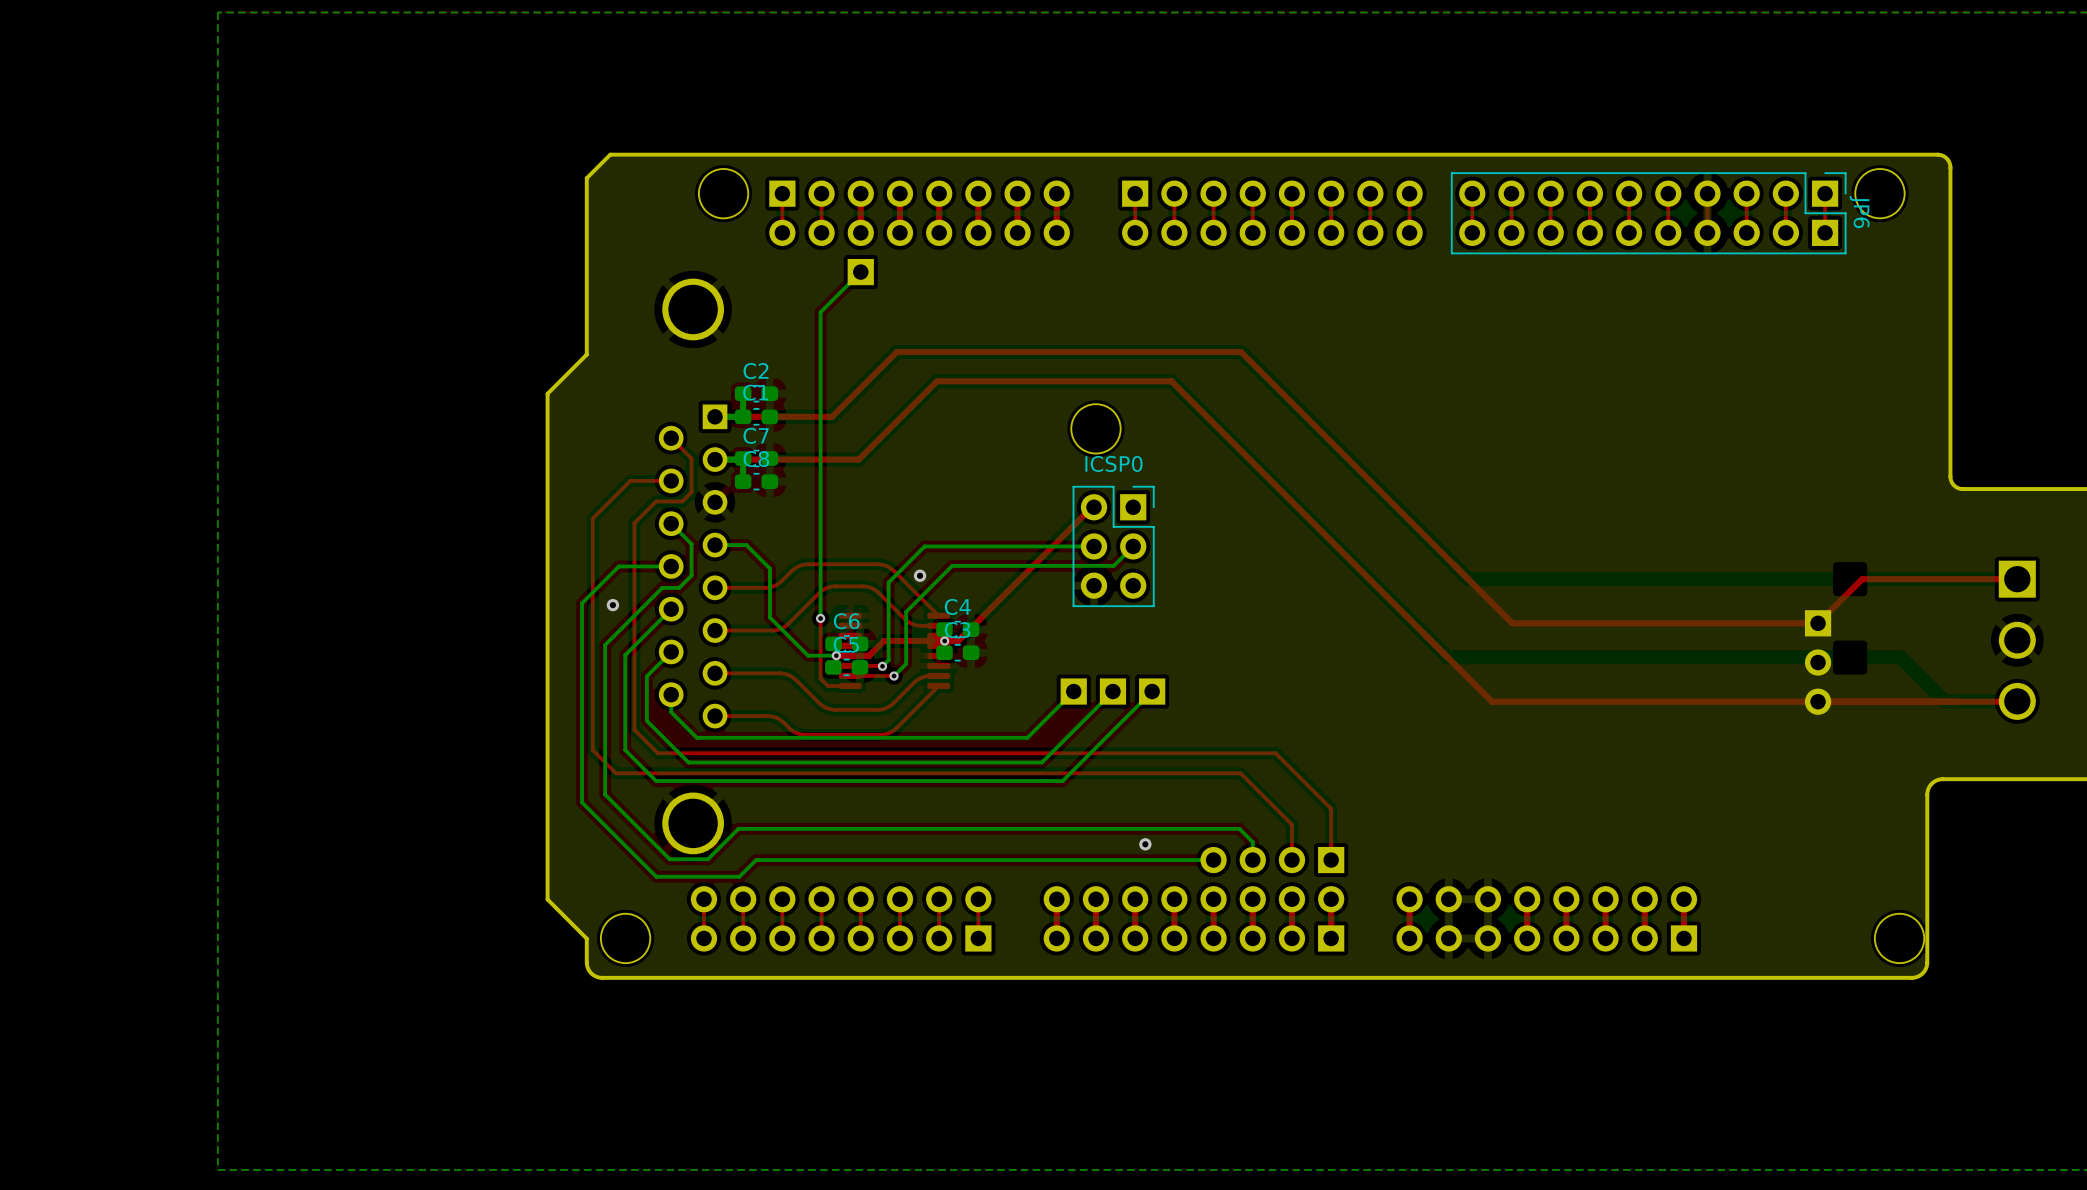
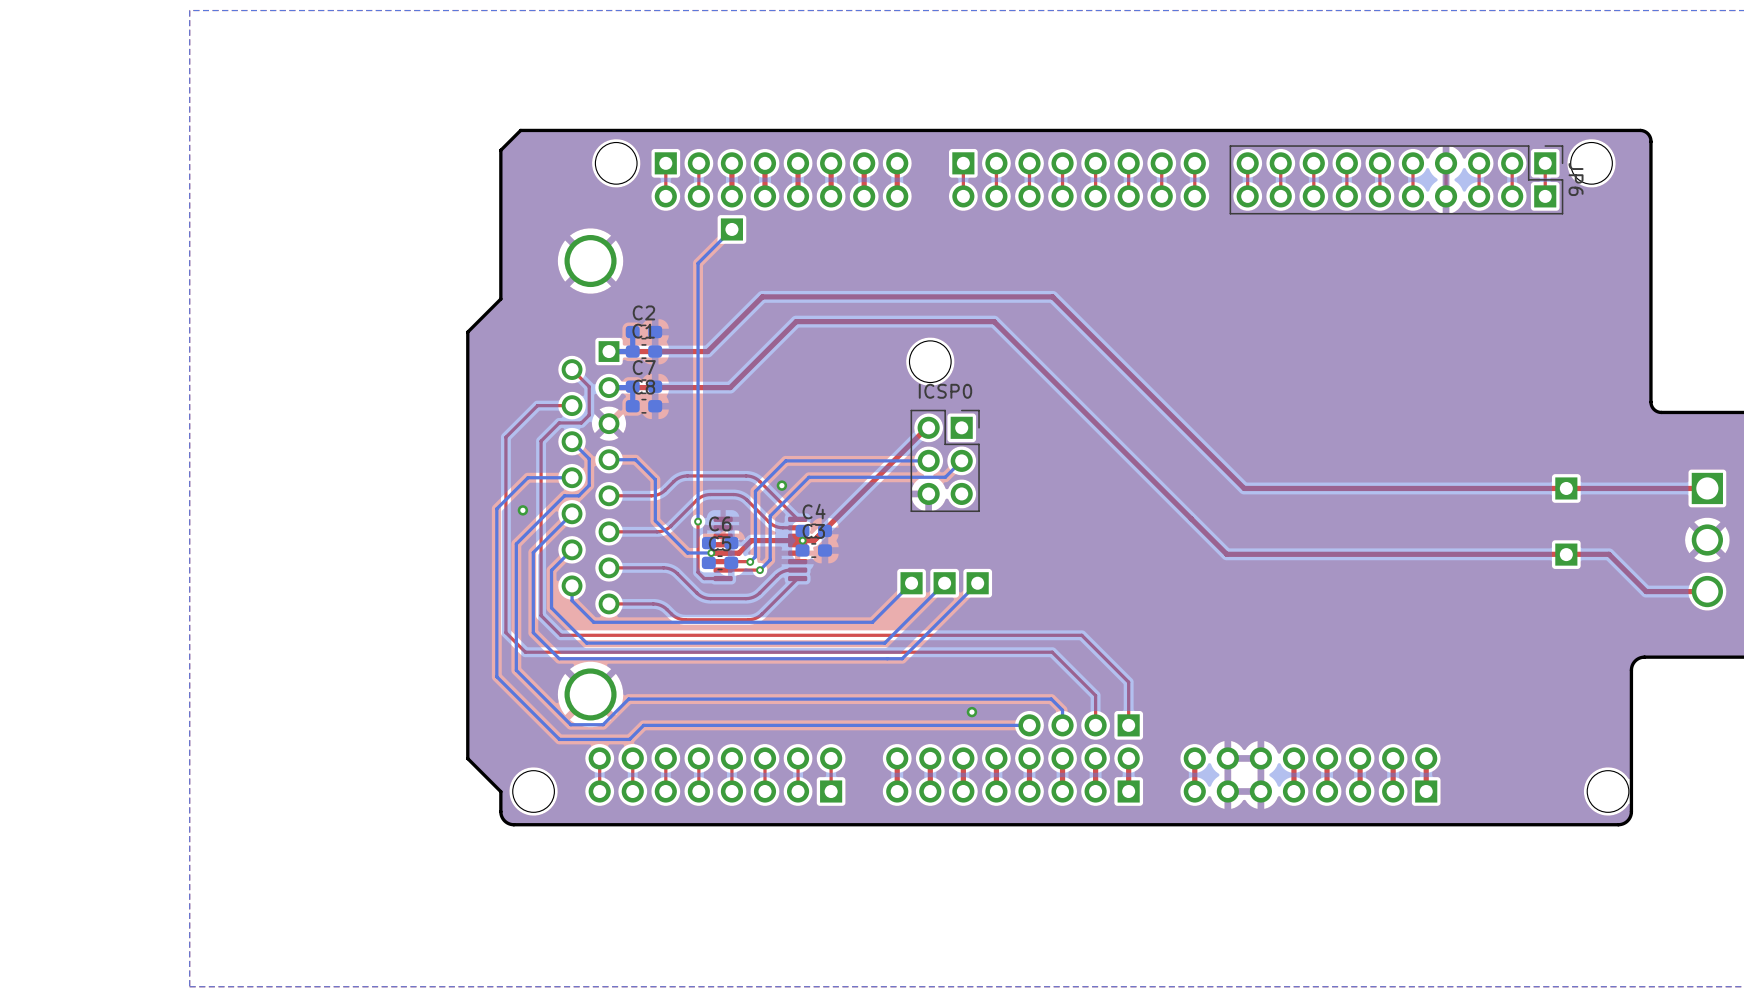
part: none -> (1566, 488)
top track: (1862, 579) (1818, 623) (1512, 623) (1468, 579) -> (1576, 488) (1244, 488)
top track: (1447, 657) (1491, 701) (2017, 701) -> (1226, 554) (1608, 554) (1646, 591) (1707, 591)
part: none -> (1566, 554)
part: (1818, 662) -> none

